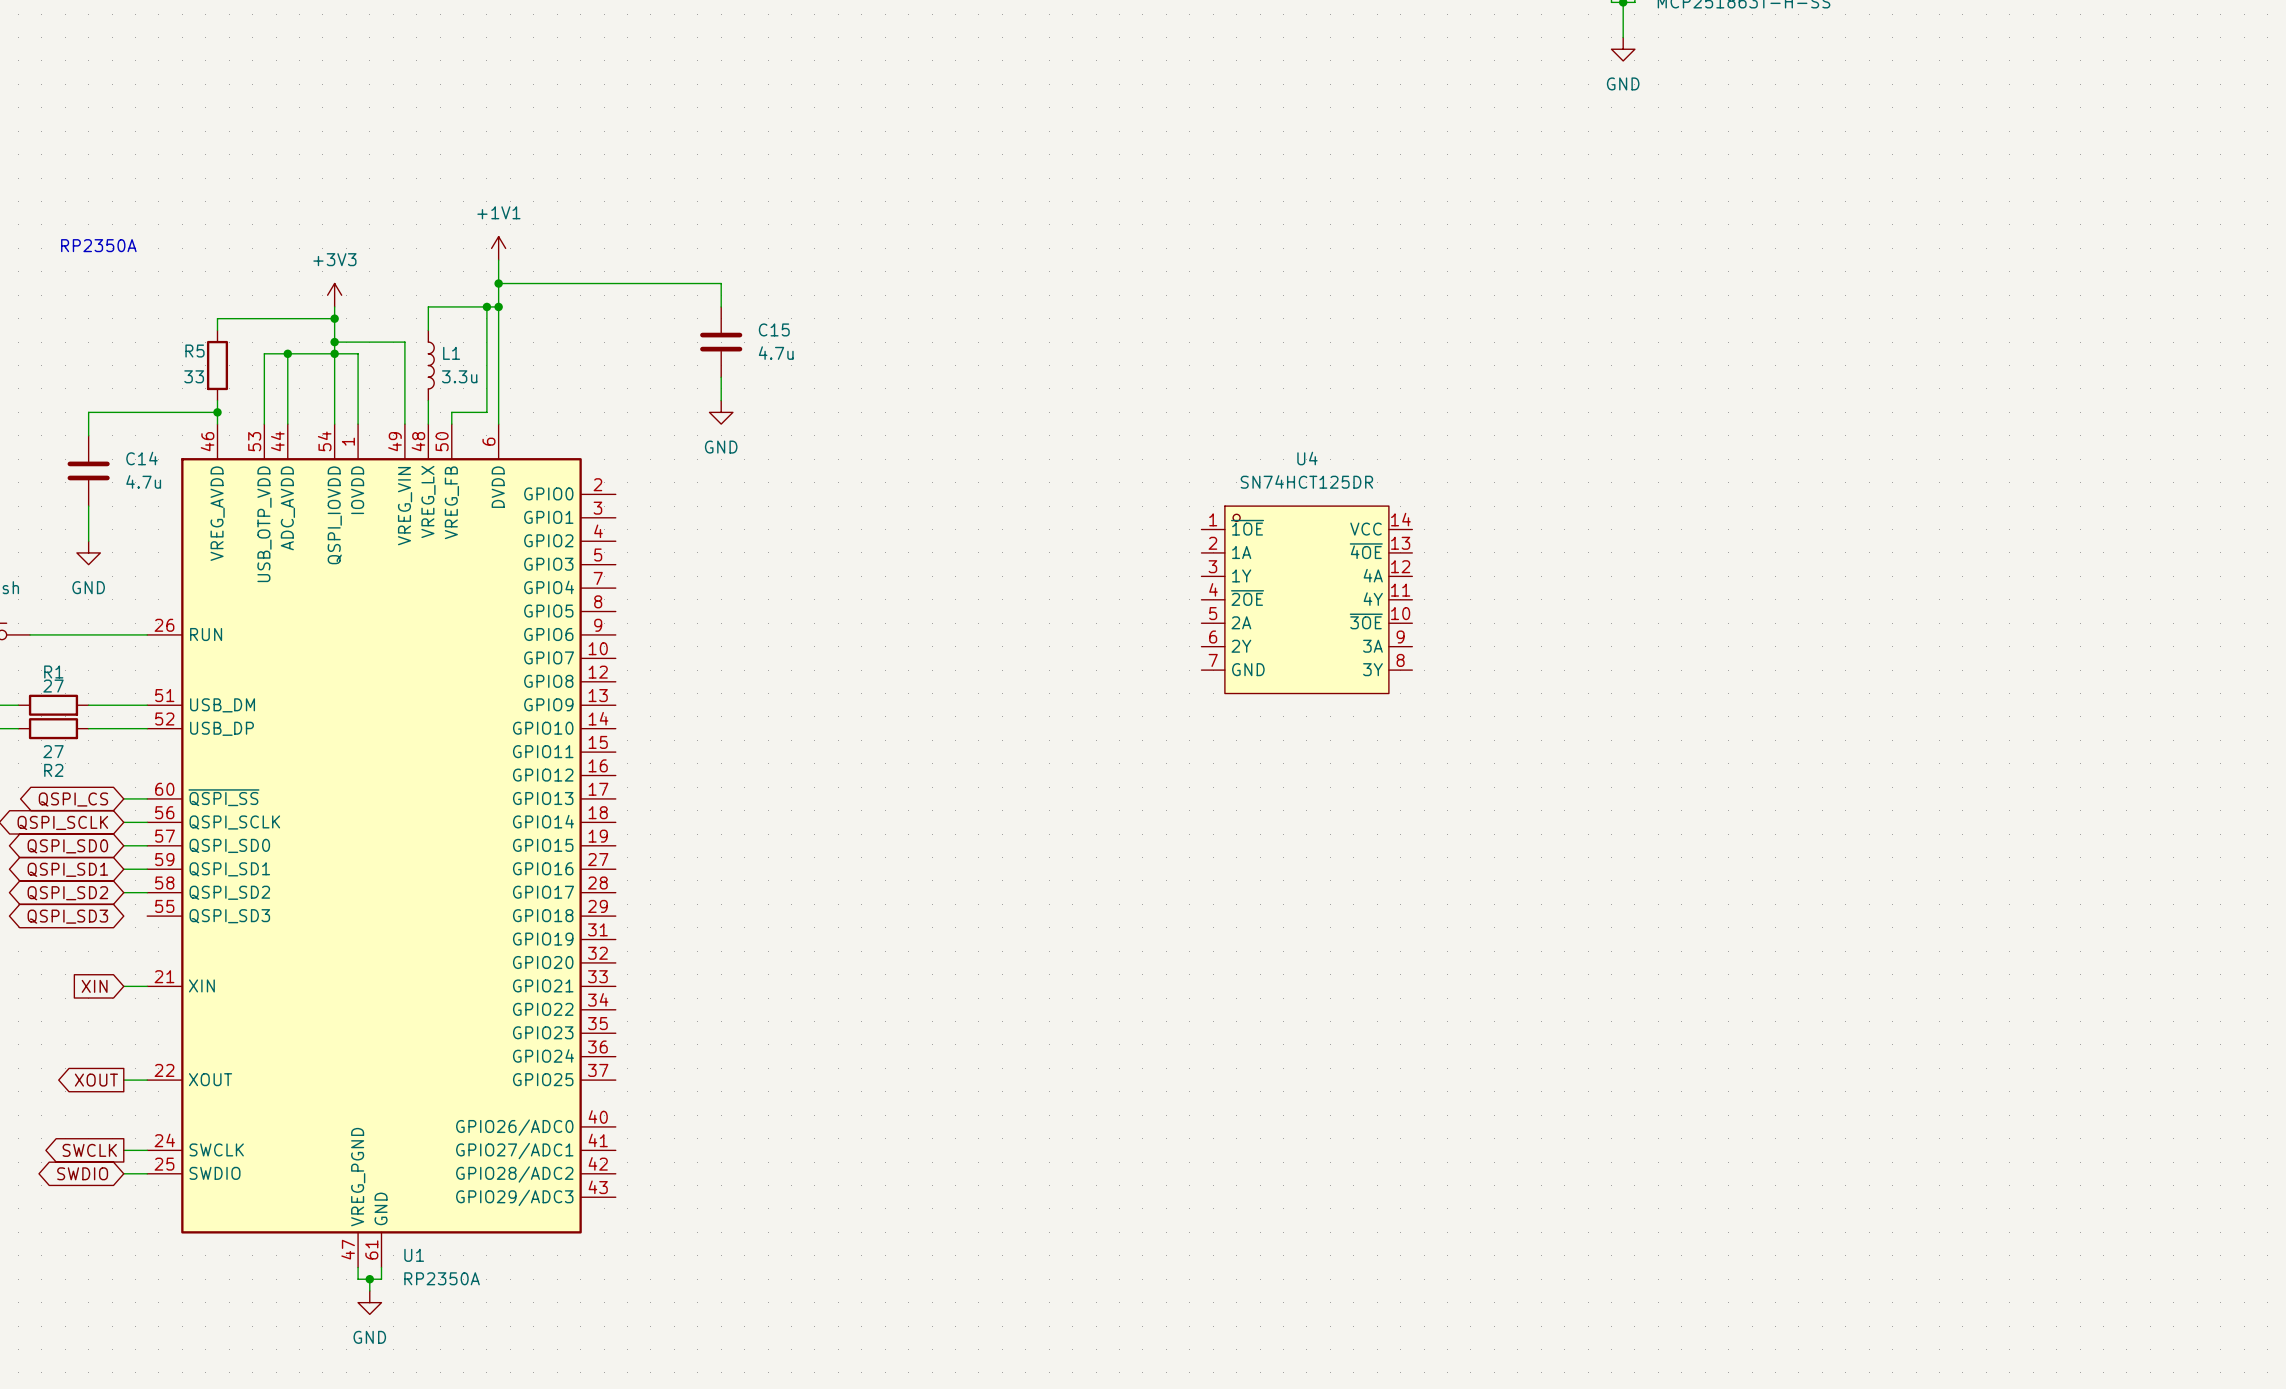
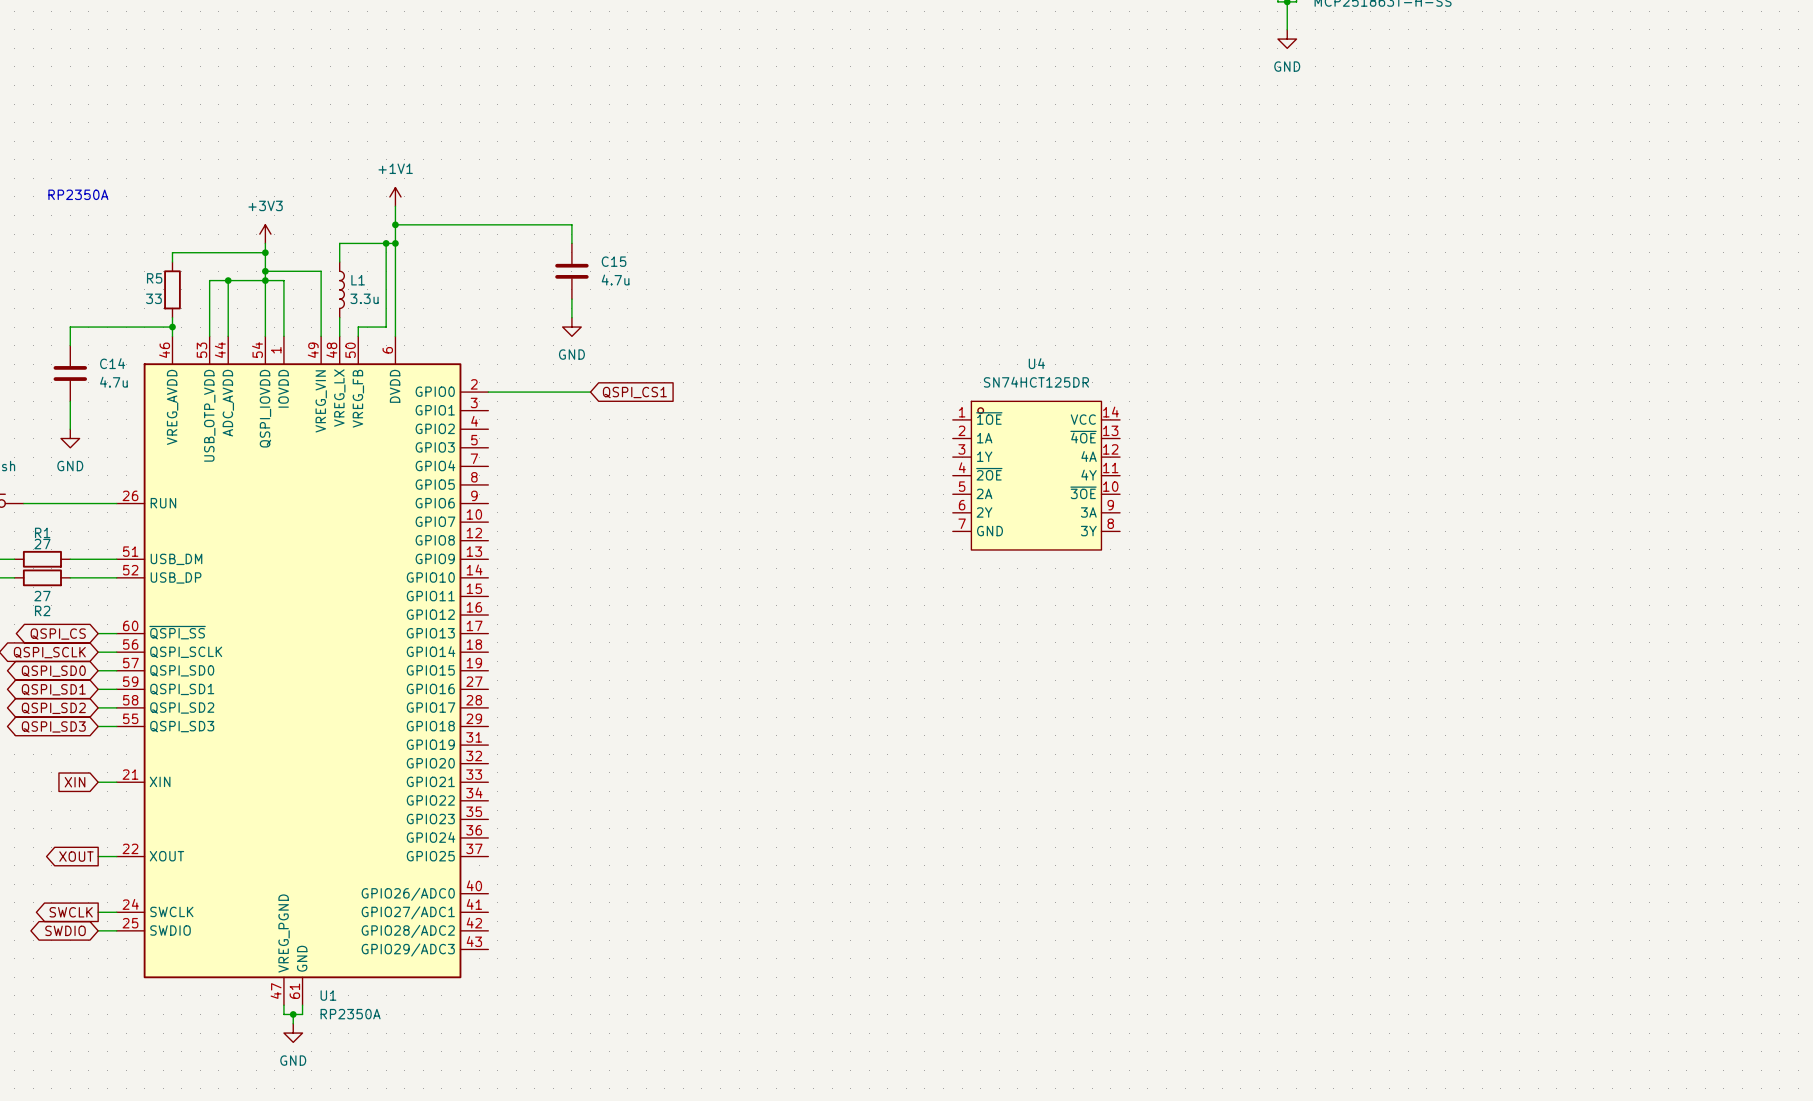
wire: none -> (488, 392) (590, 392)
global label: none -> QSPI_CS1 (634, 392)
wire: none -> (98, 726) (116, 726)

